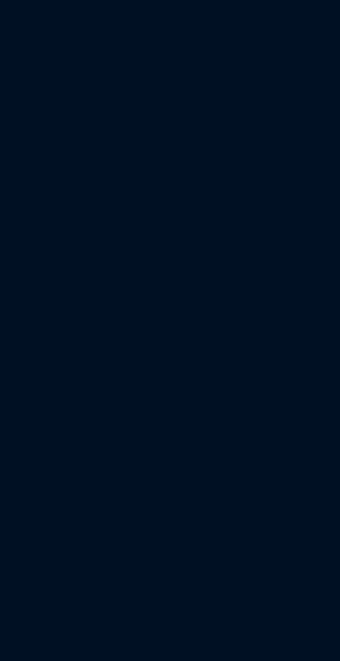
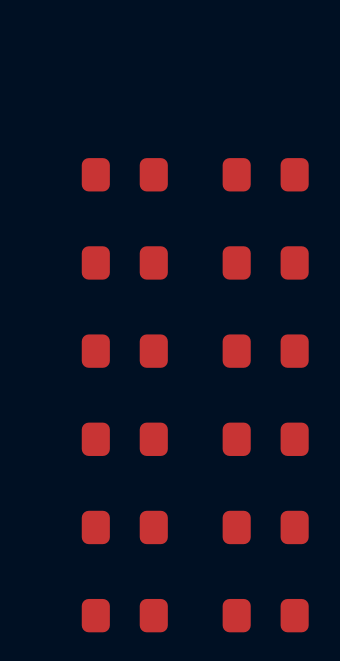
part: none -> (124, 174)
part: none -> (265, 174)
part: none -> (124, 262)
part: none -> (265, 262)
part: none -> (124, 351)
part: none -> (265, 351)
part: none -> (124, 439)
part: none -> (265, 439)
part: none -> (124, 527)
part: none -> (265, 527)
part: none -> (124, 615)
part: none -> (265, 615)

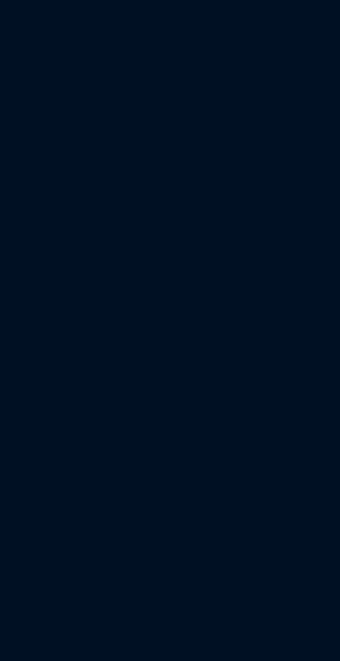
part: (124, 174) -> none
part: (265, 174) -> none
part: (124, 262) -> none
part: (265, 262) -> none
part: (124, 351) -> none
part: (265, 351) -> none
part: (124, 439) -> none
part: (265, 439) -> none
part: (124, 527) -> none
part: (265, 527) -> none
part: (124, 615) -> none
part: (265, 615) -> none

